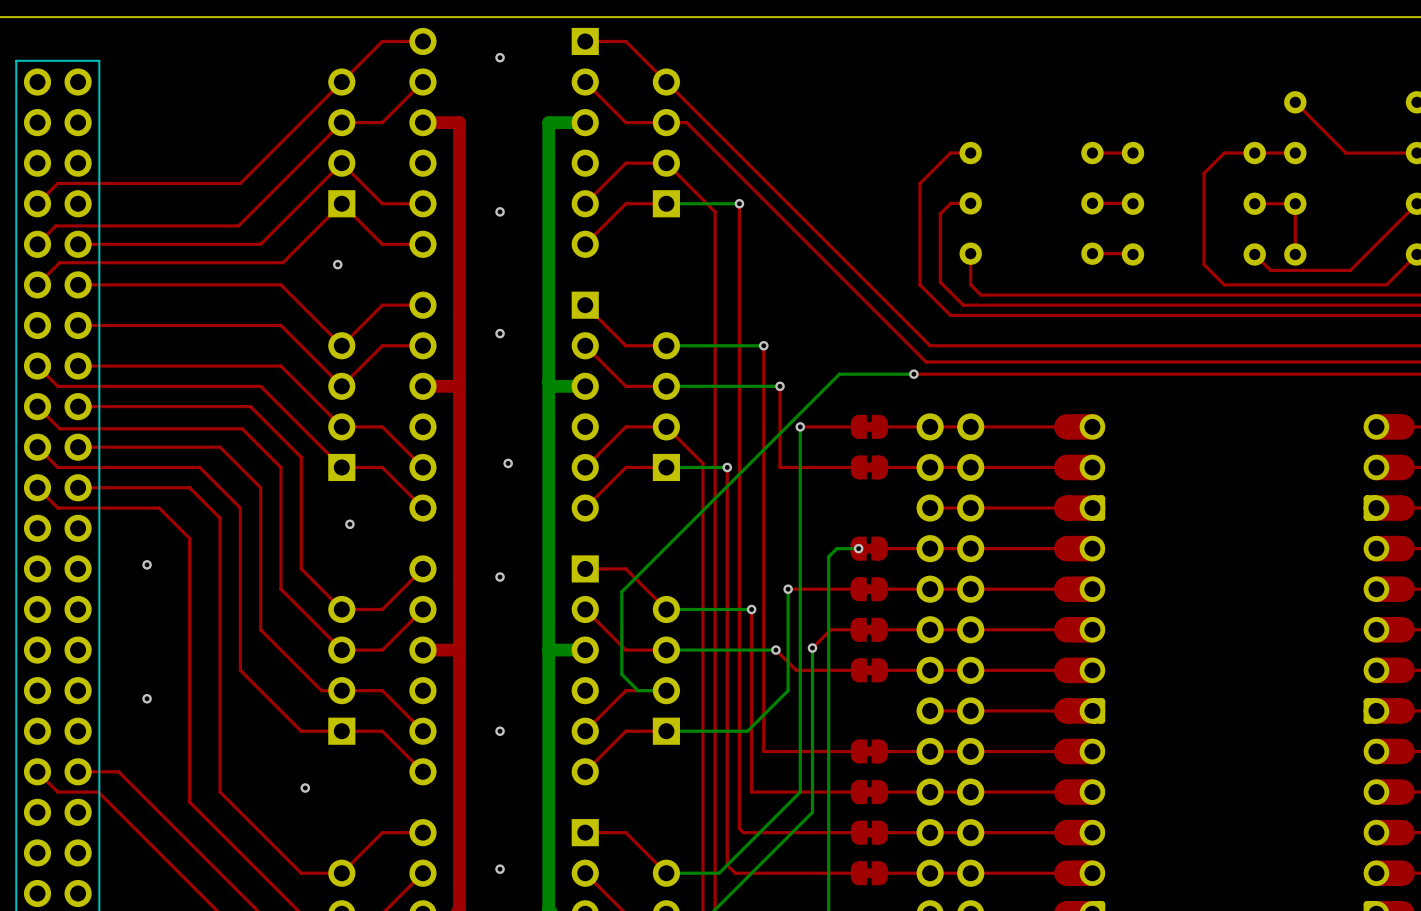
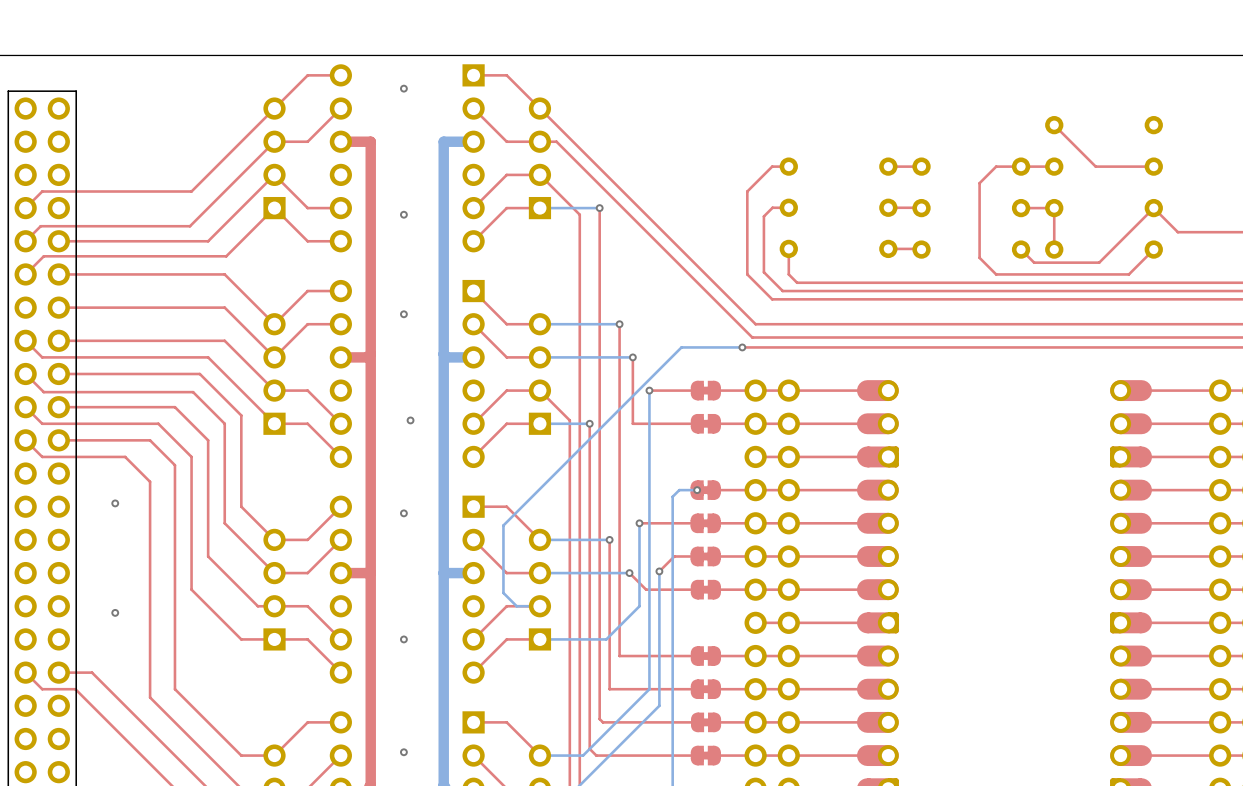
via: (337, 264) -> none
via: (349, 524) -> none
via: (305, 788) -> none

